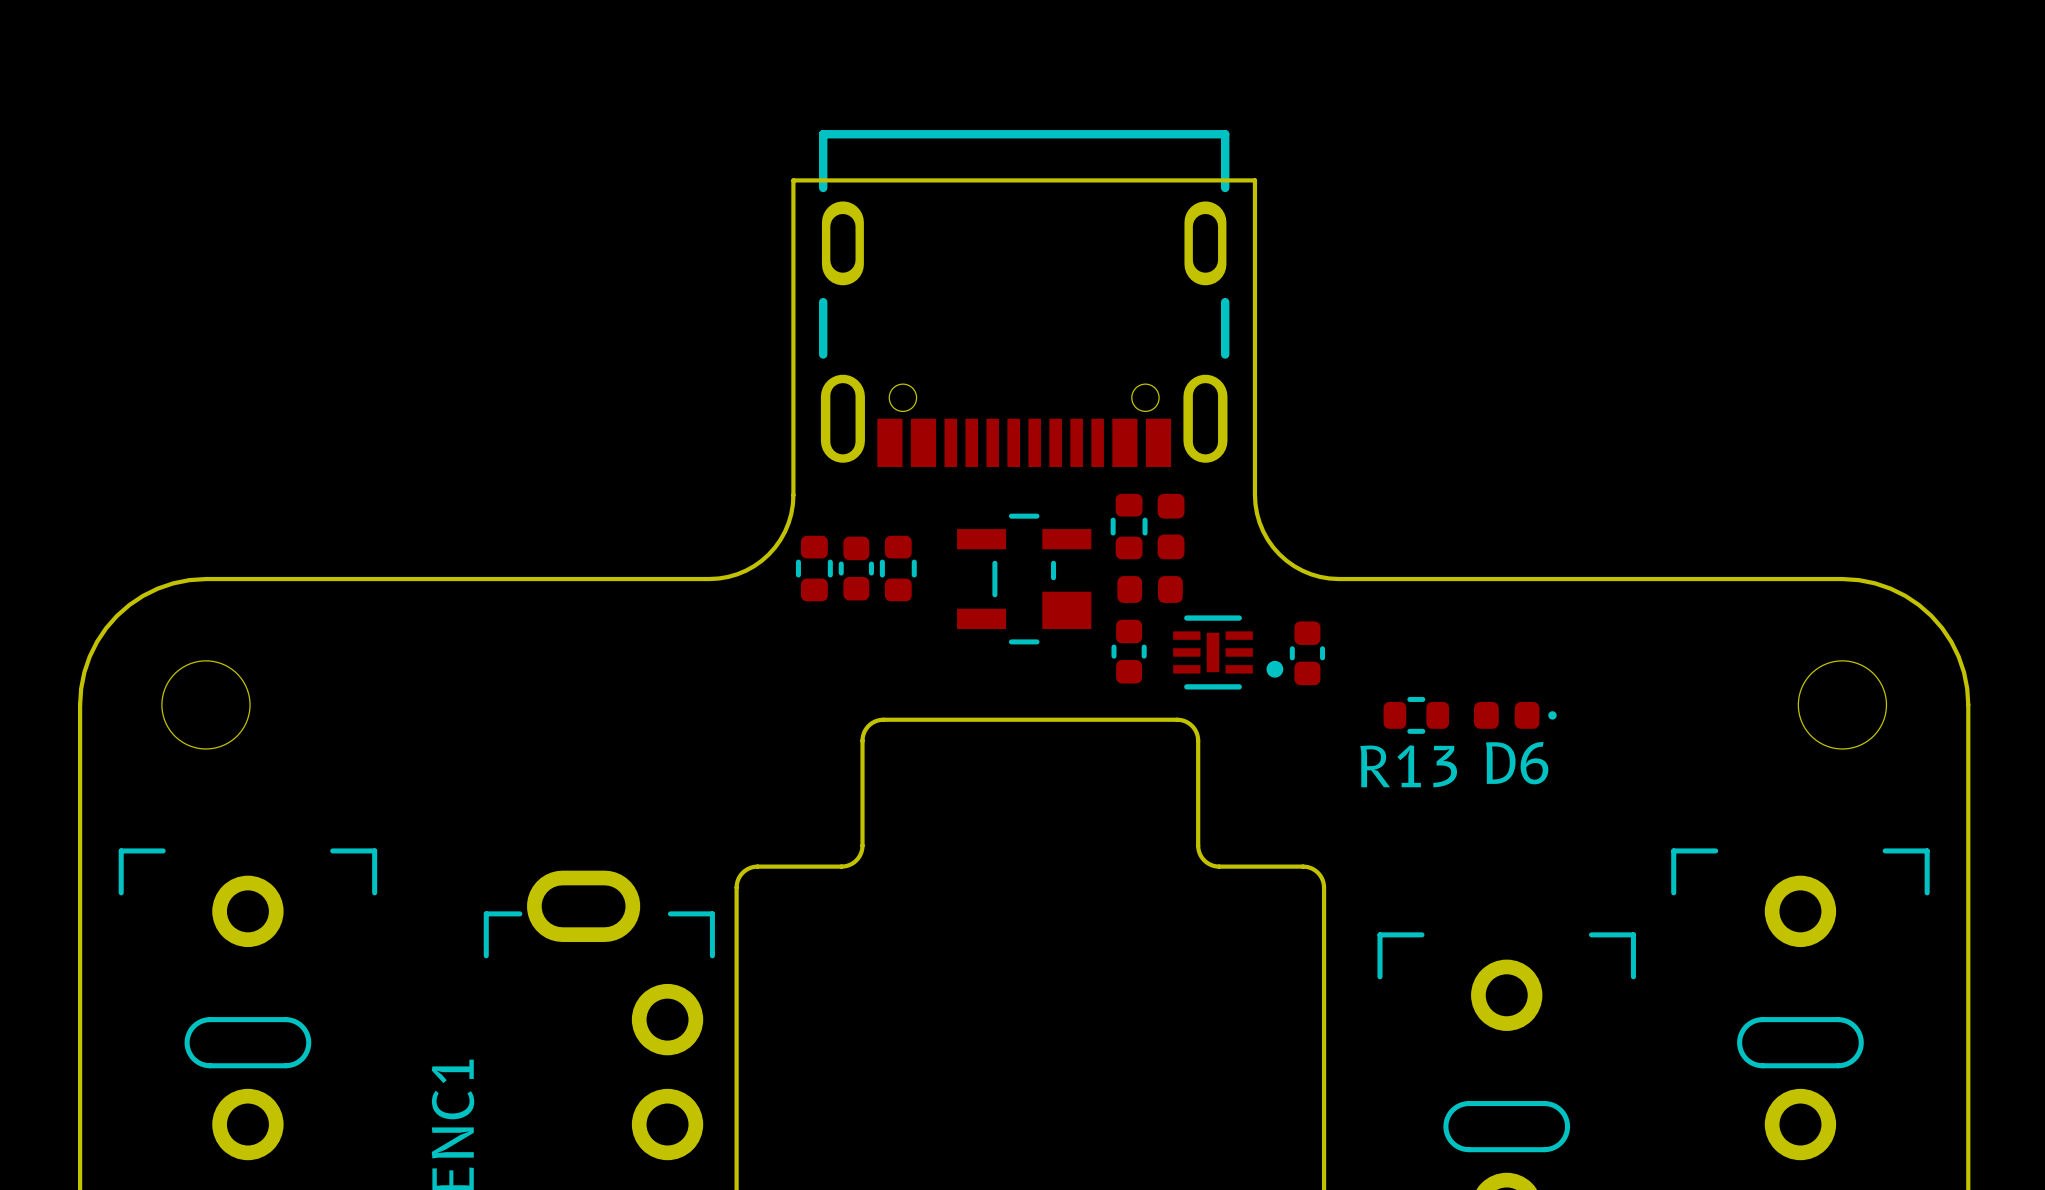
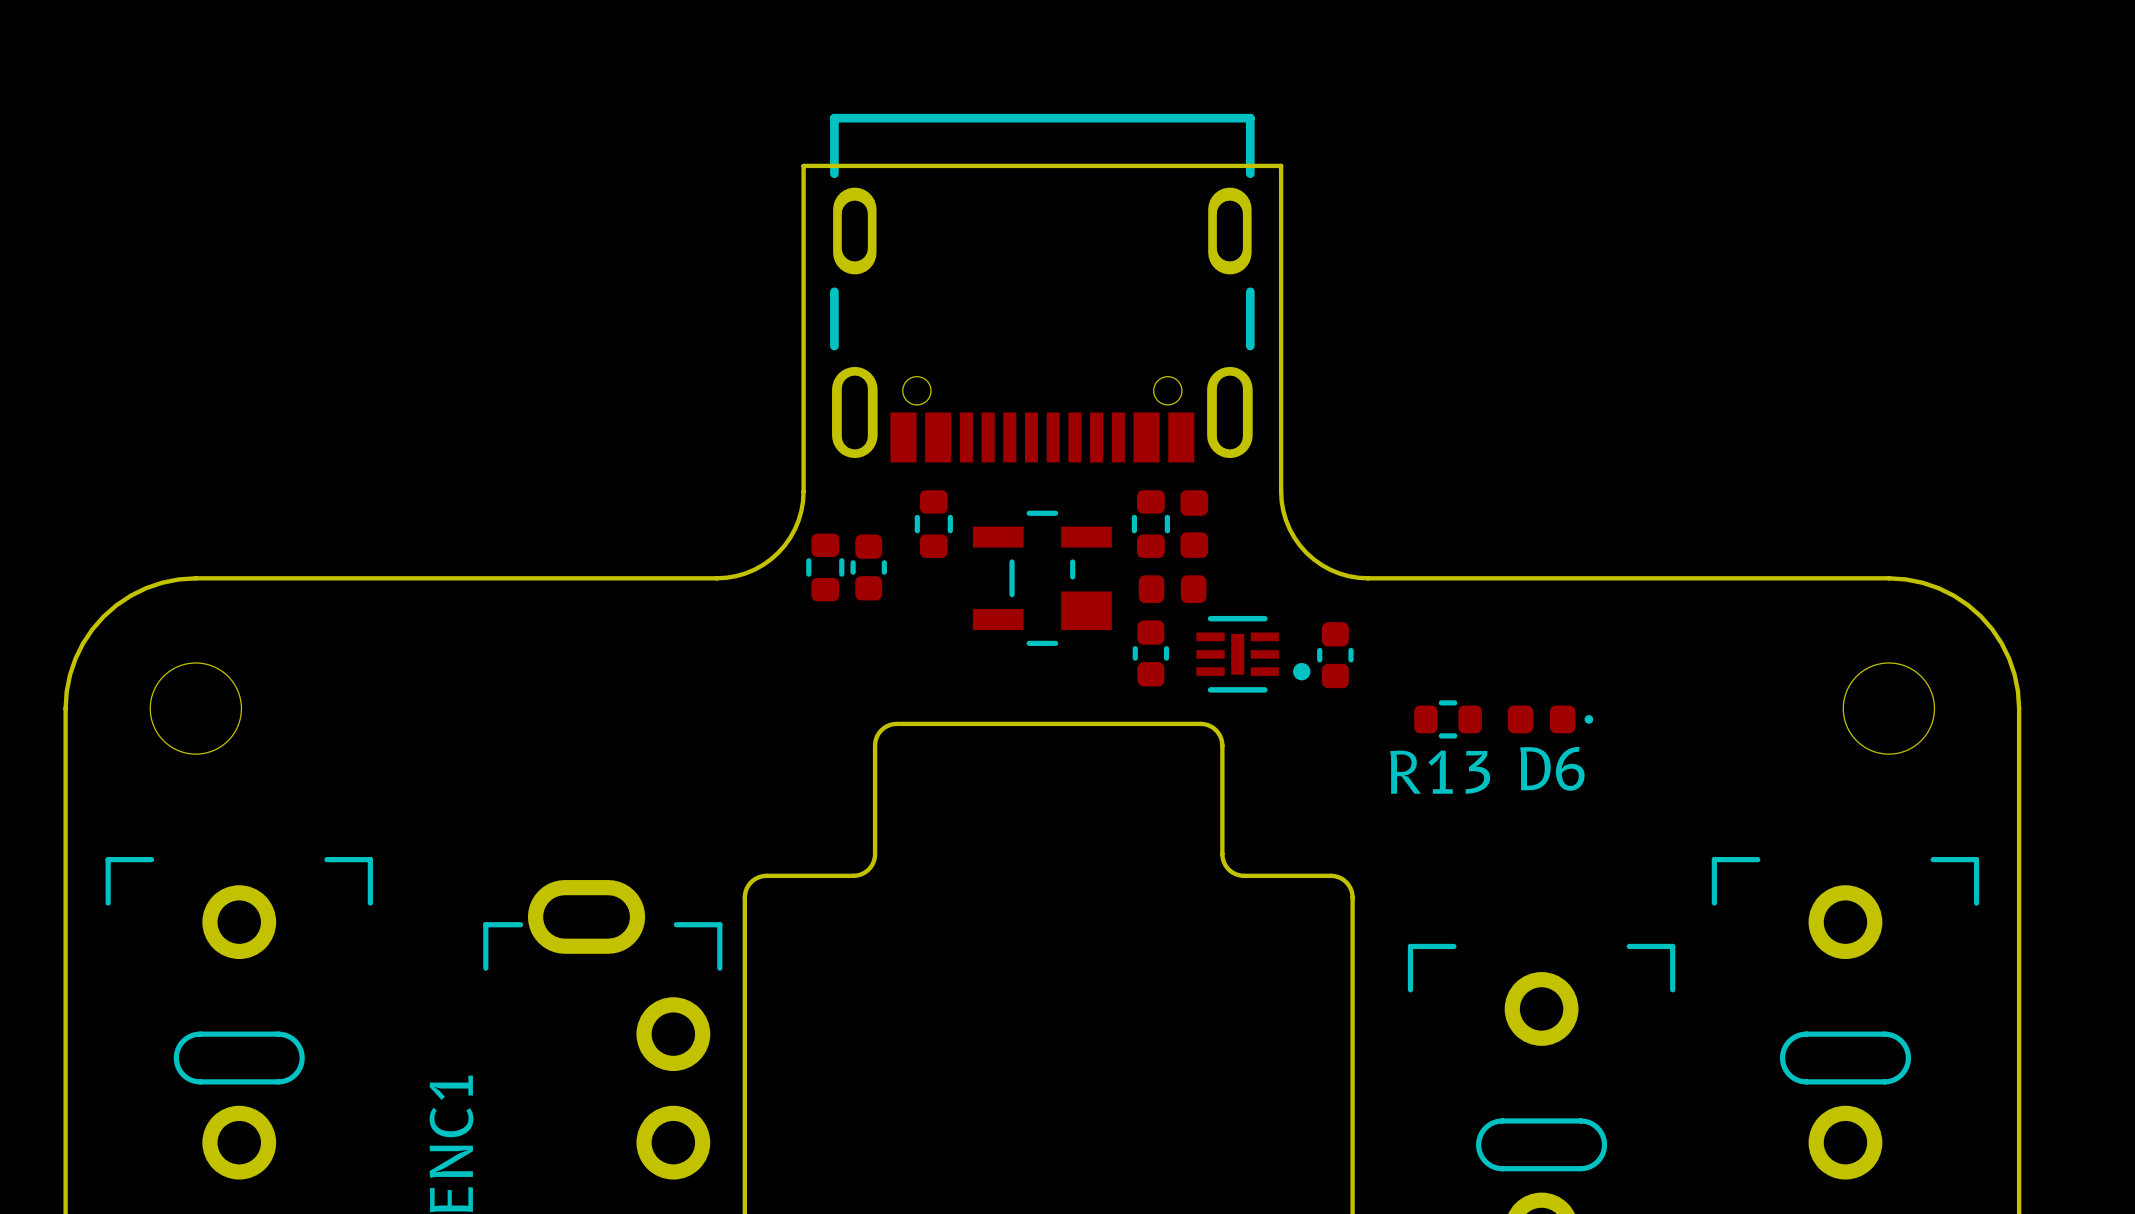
part position: (898, 568) -> (933, 524)

